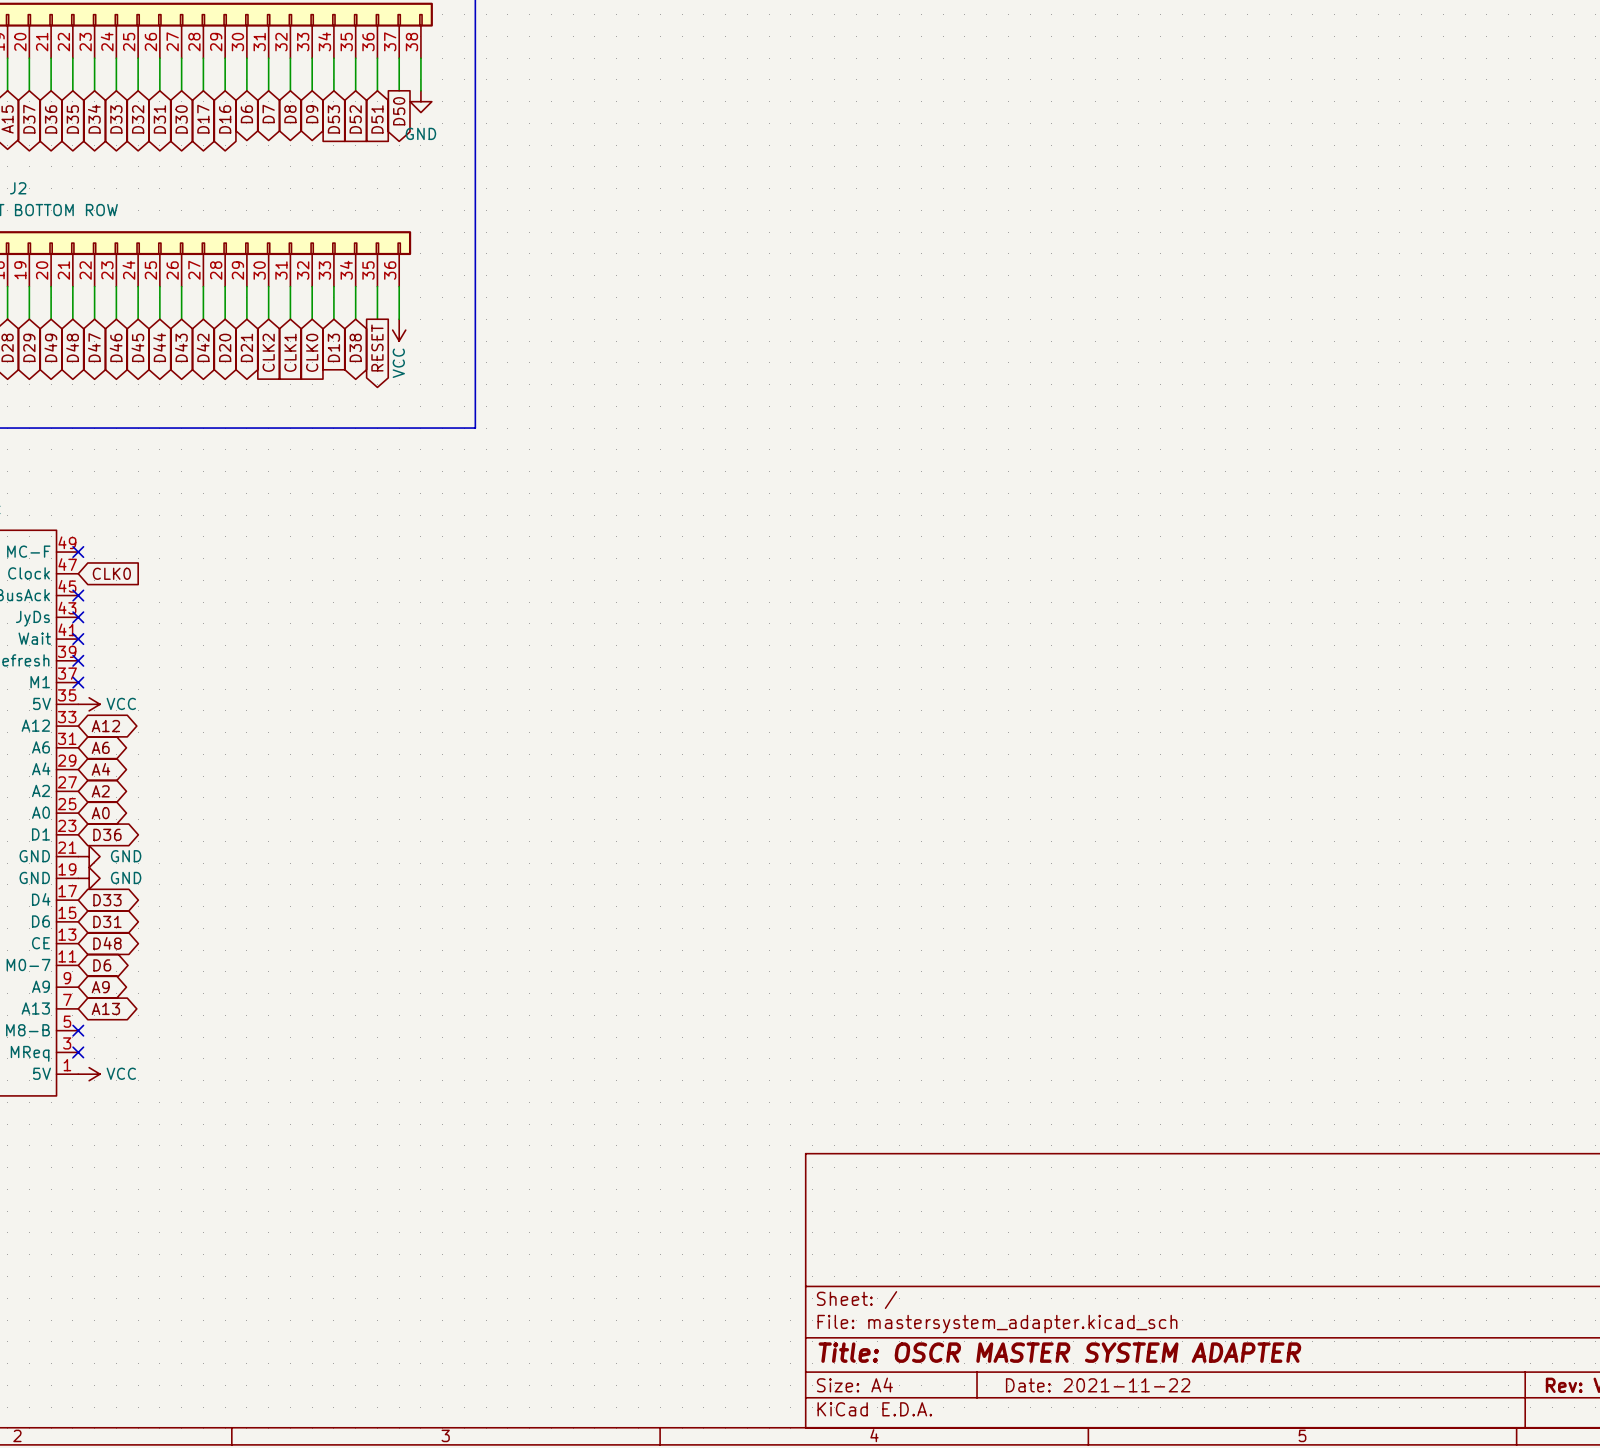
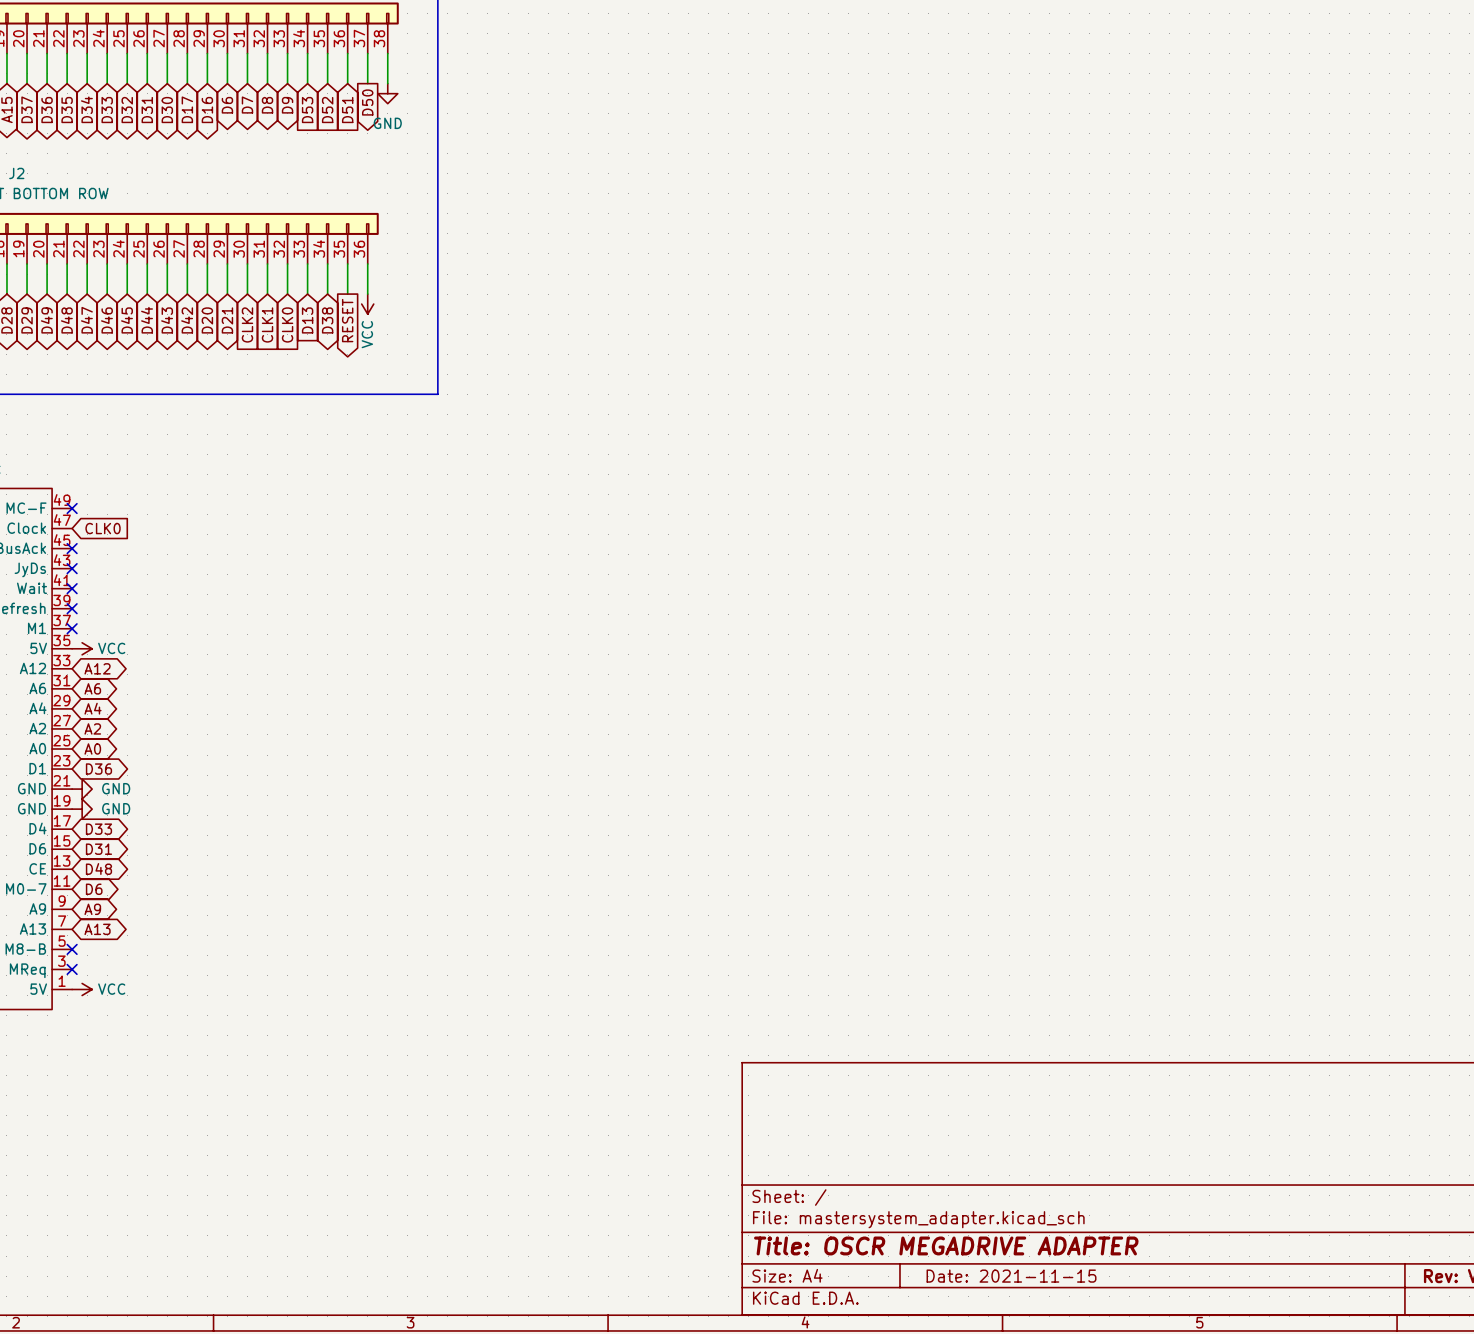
title block: Title: OSCR MASTER SYSTEM ADAPTER (1059, 1352) -> Title: OSCR MEGADRIVE ADAPTER (946, 1245)
title block: Date: 2021-11-22 (1098, 1385) -> Date: 2021-11-15 (1011, 1276)

